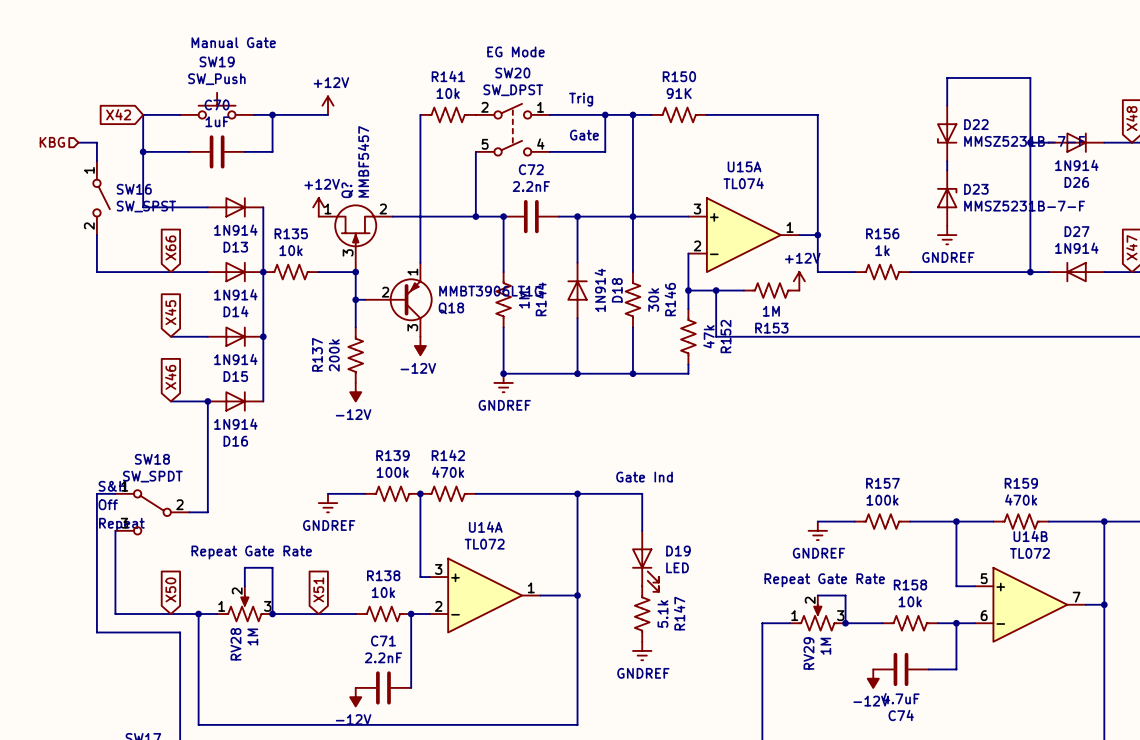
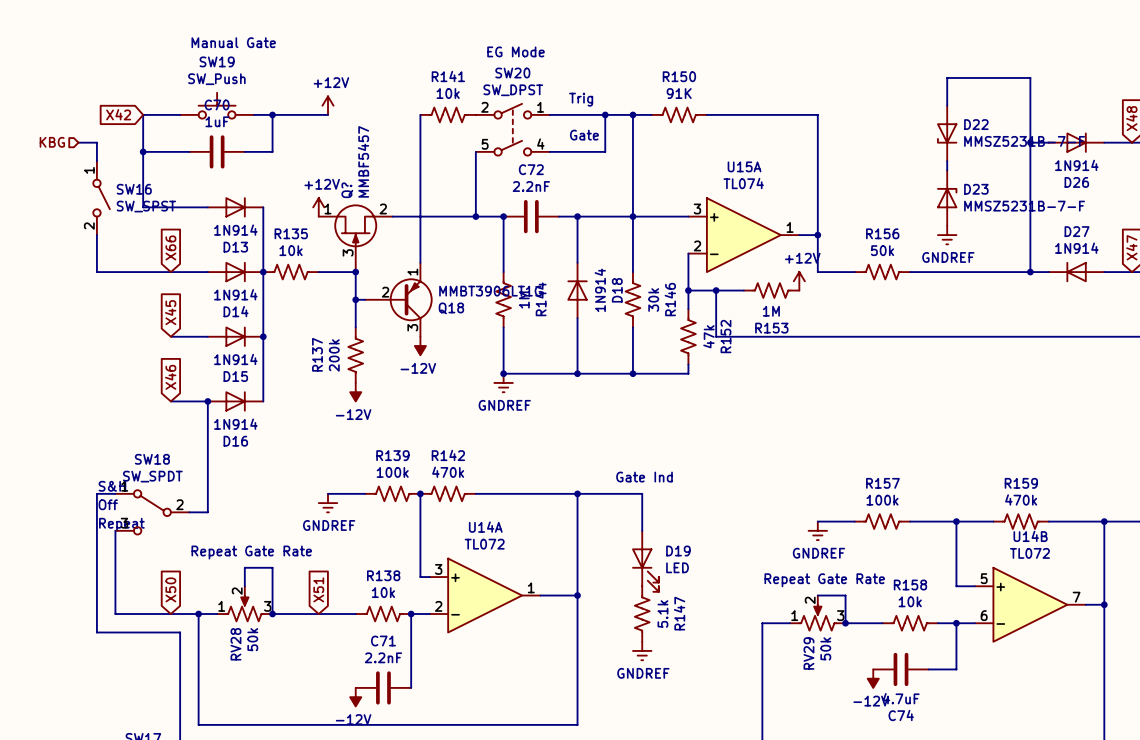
R156 value: 1k (882, 250) -> 50k (882, 250)
RV28 value: 1M (252, 637) -> 50k (252, 639)
RV29 value: 1M (825, 646) -> 50k (825, 648)

